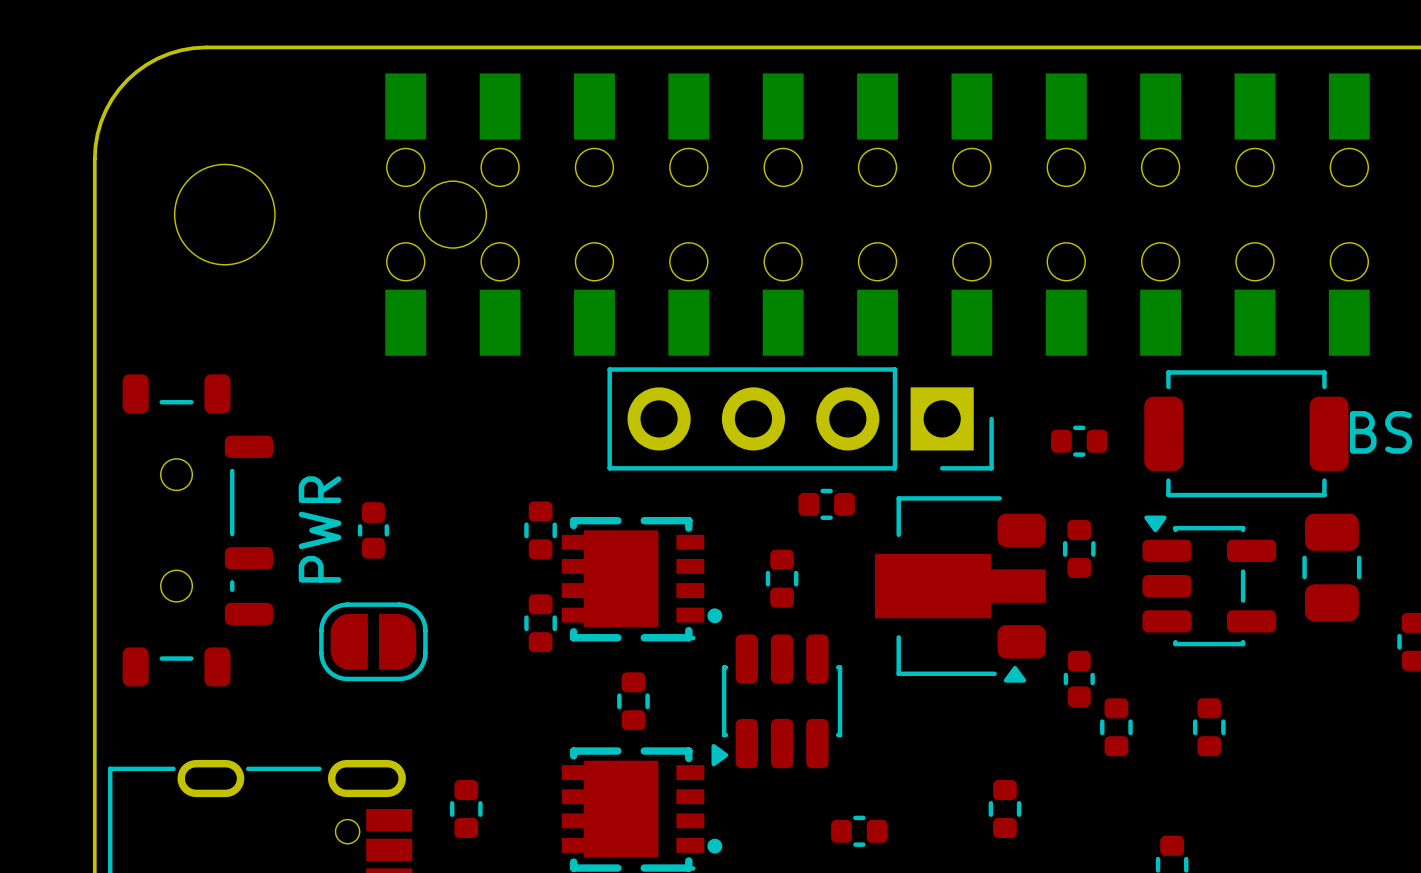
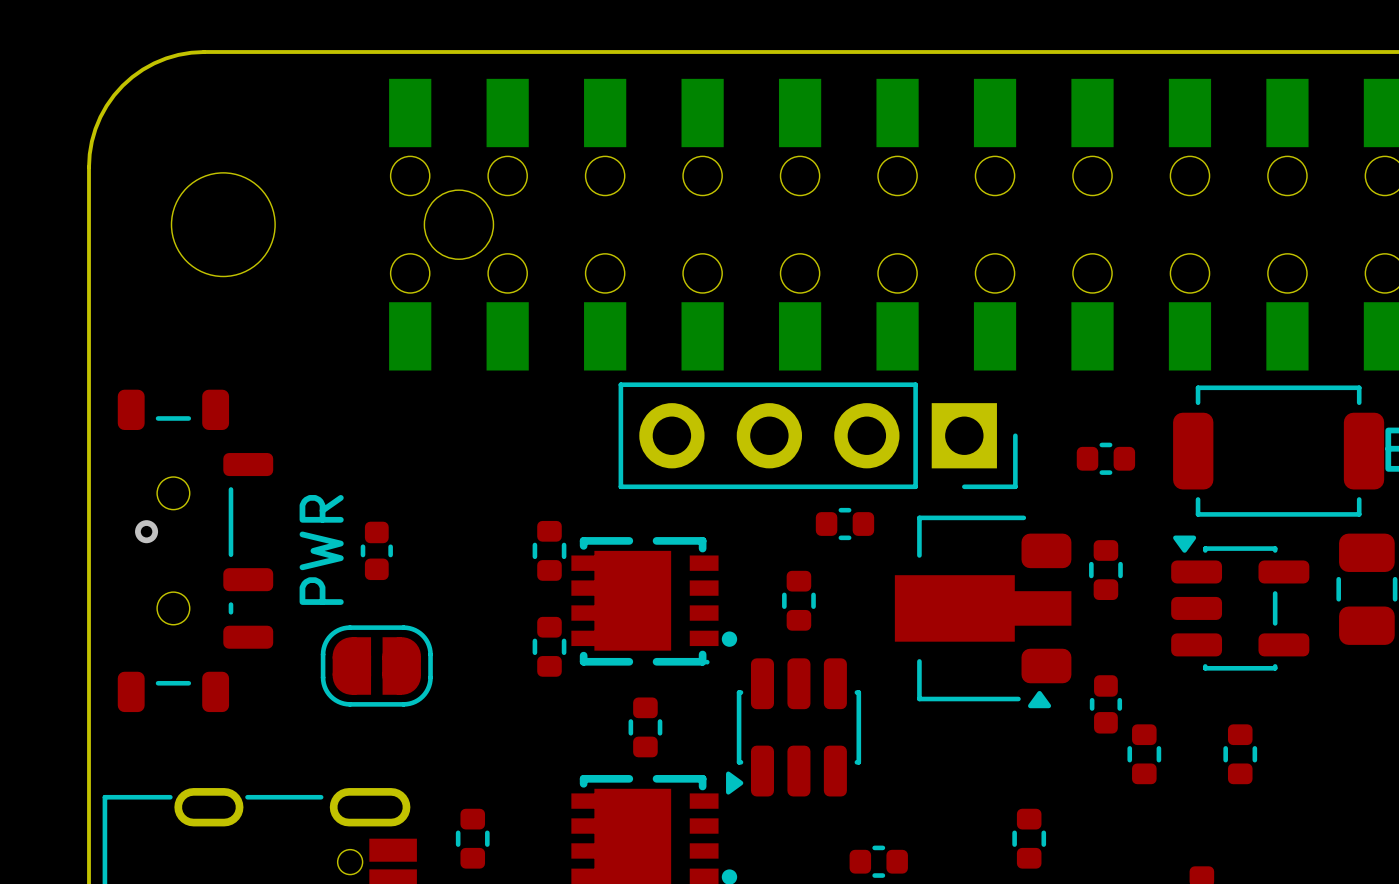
via: none -> (146, 531)

